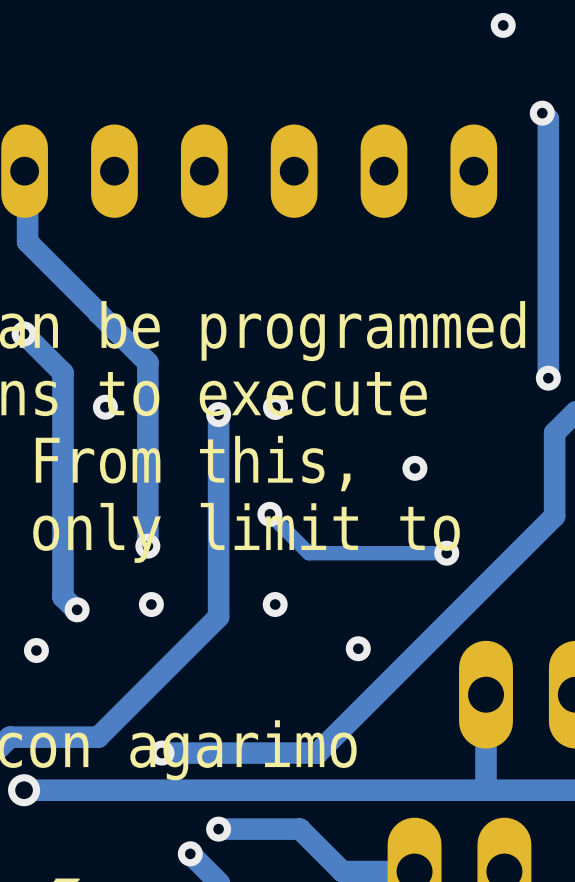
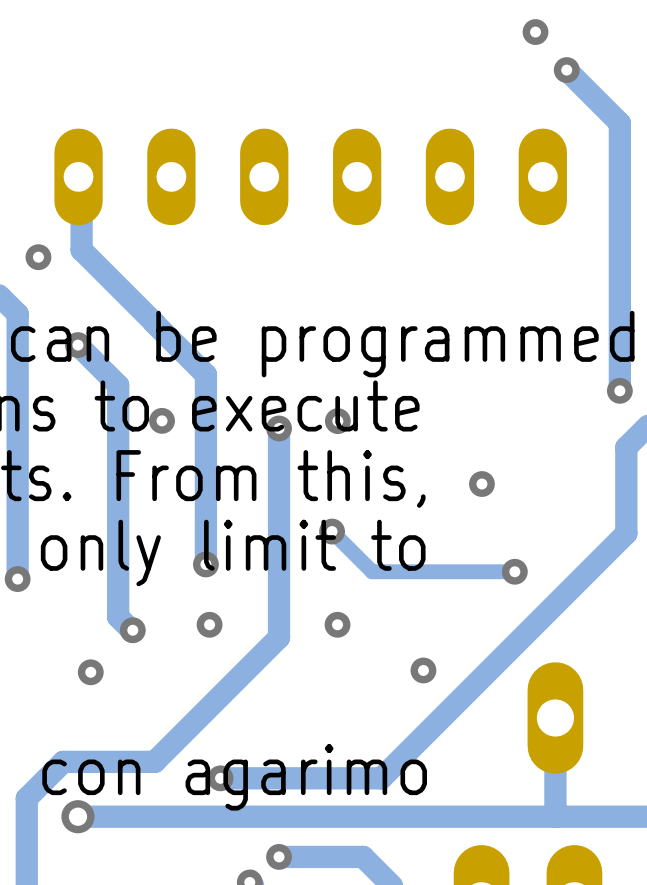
via: (503, 25) -> none
via: none -> (535, 32)
track: none -> (566, 70) (613, 116)
via: none -> (566, 70)
via: (542, 113) -> none

